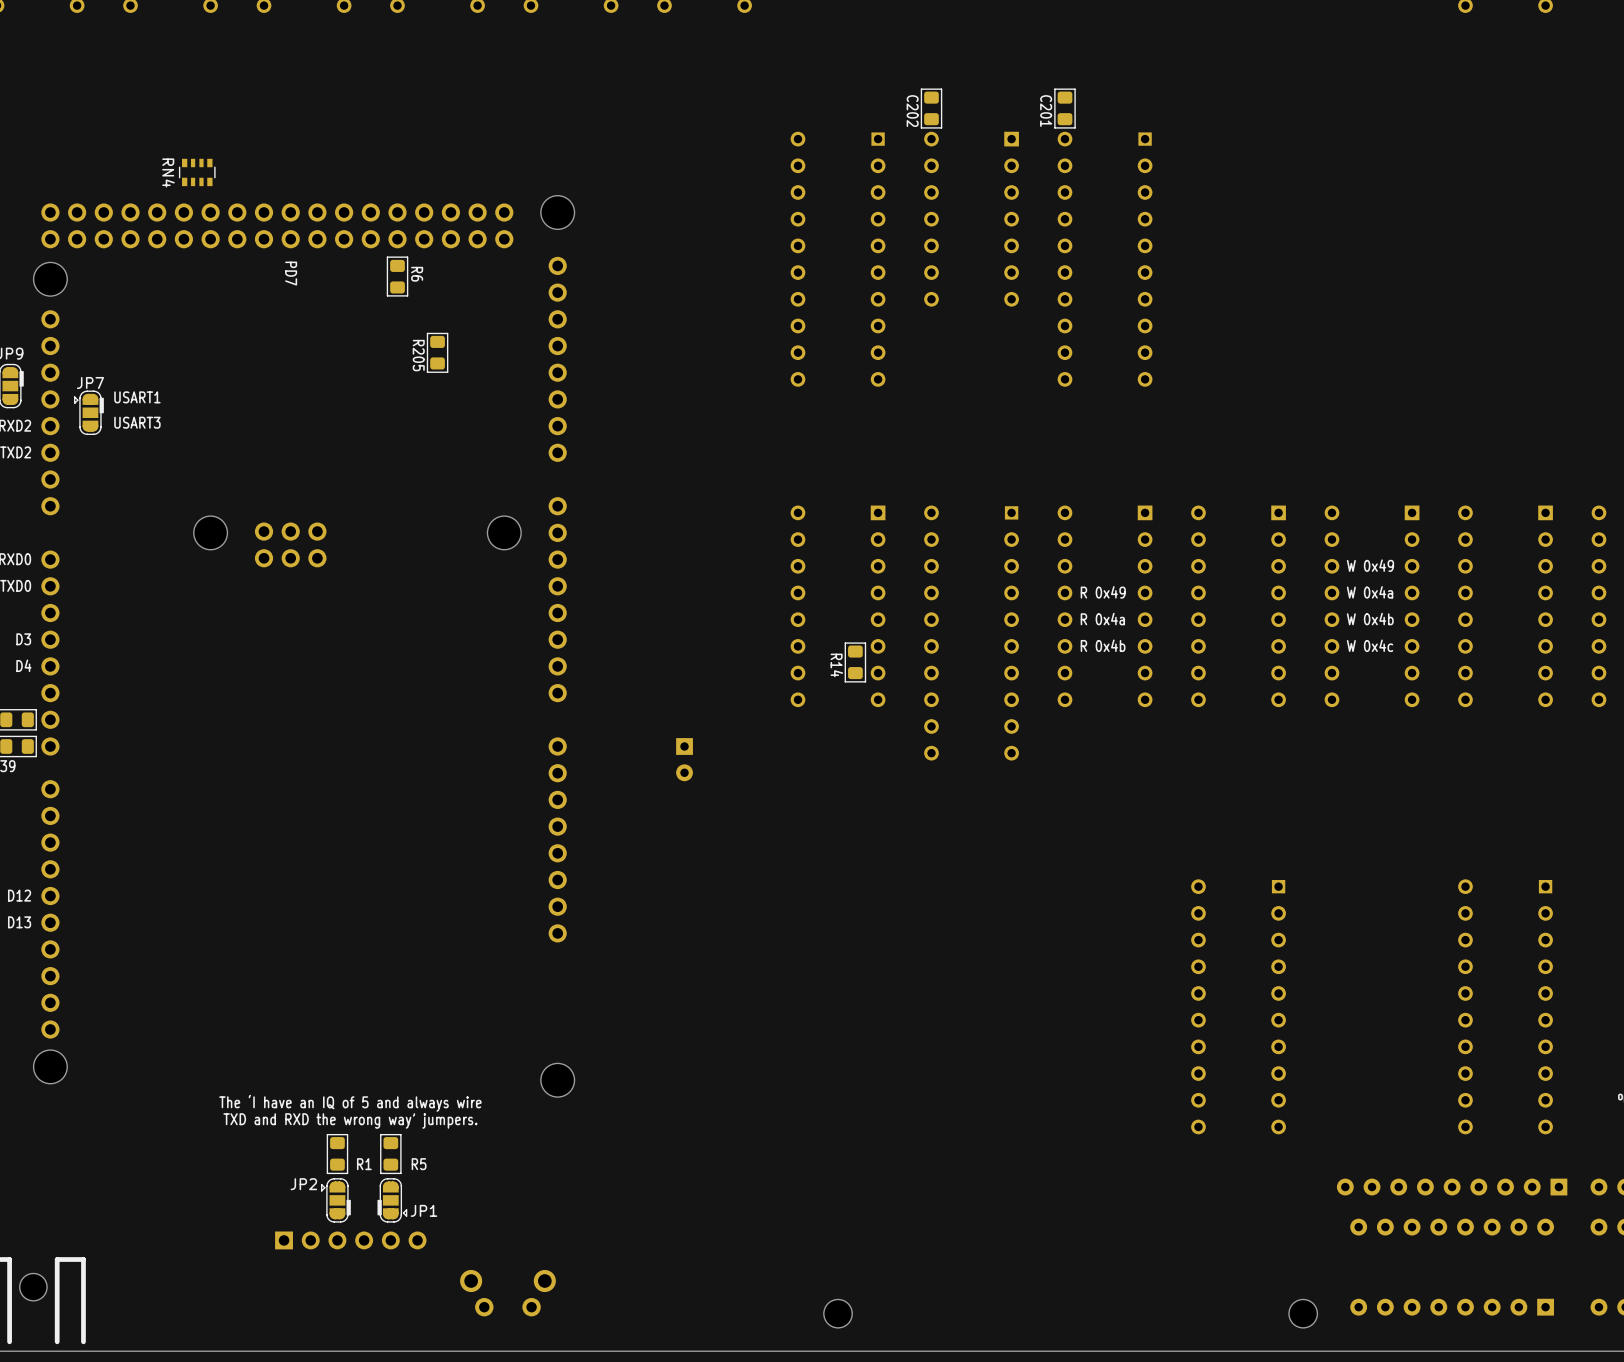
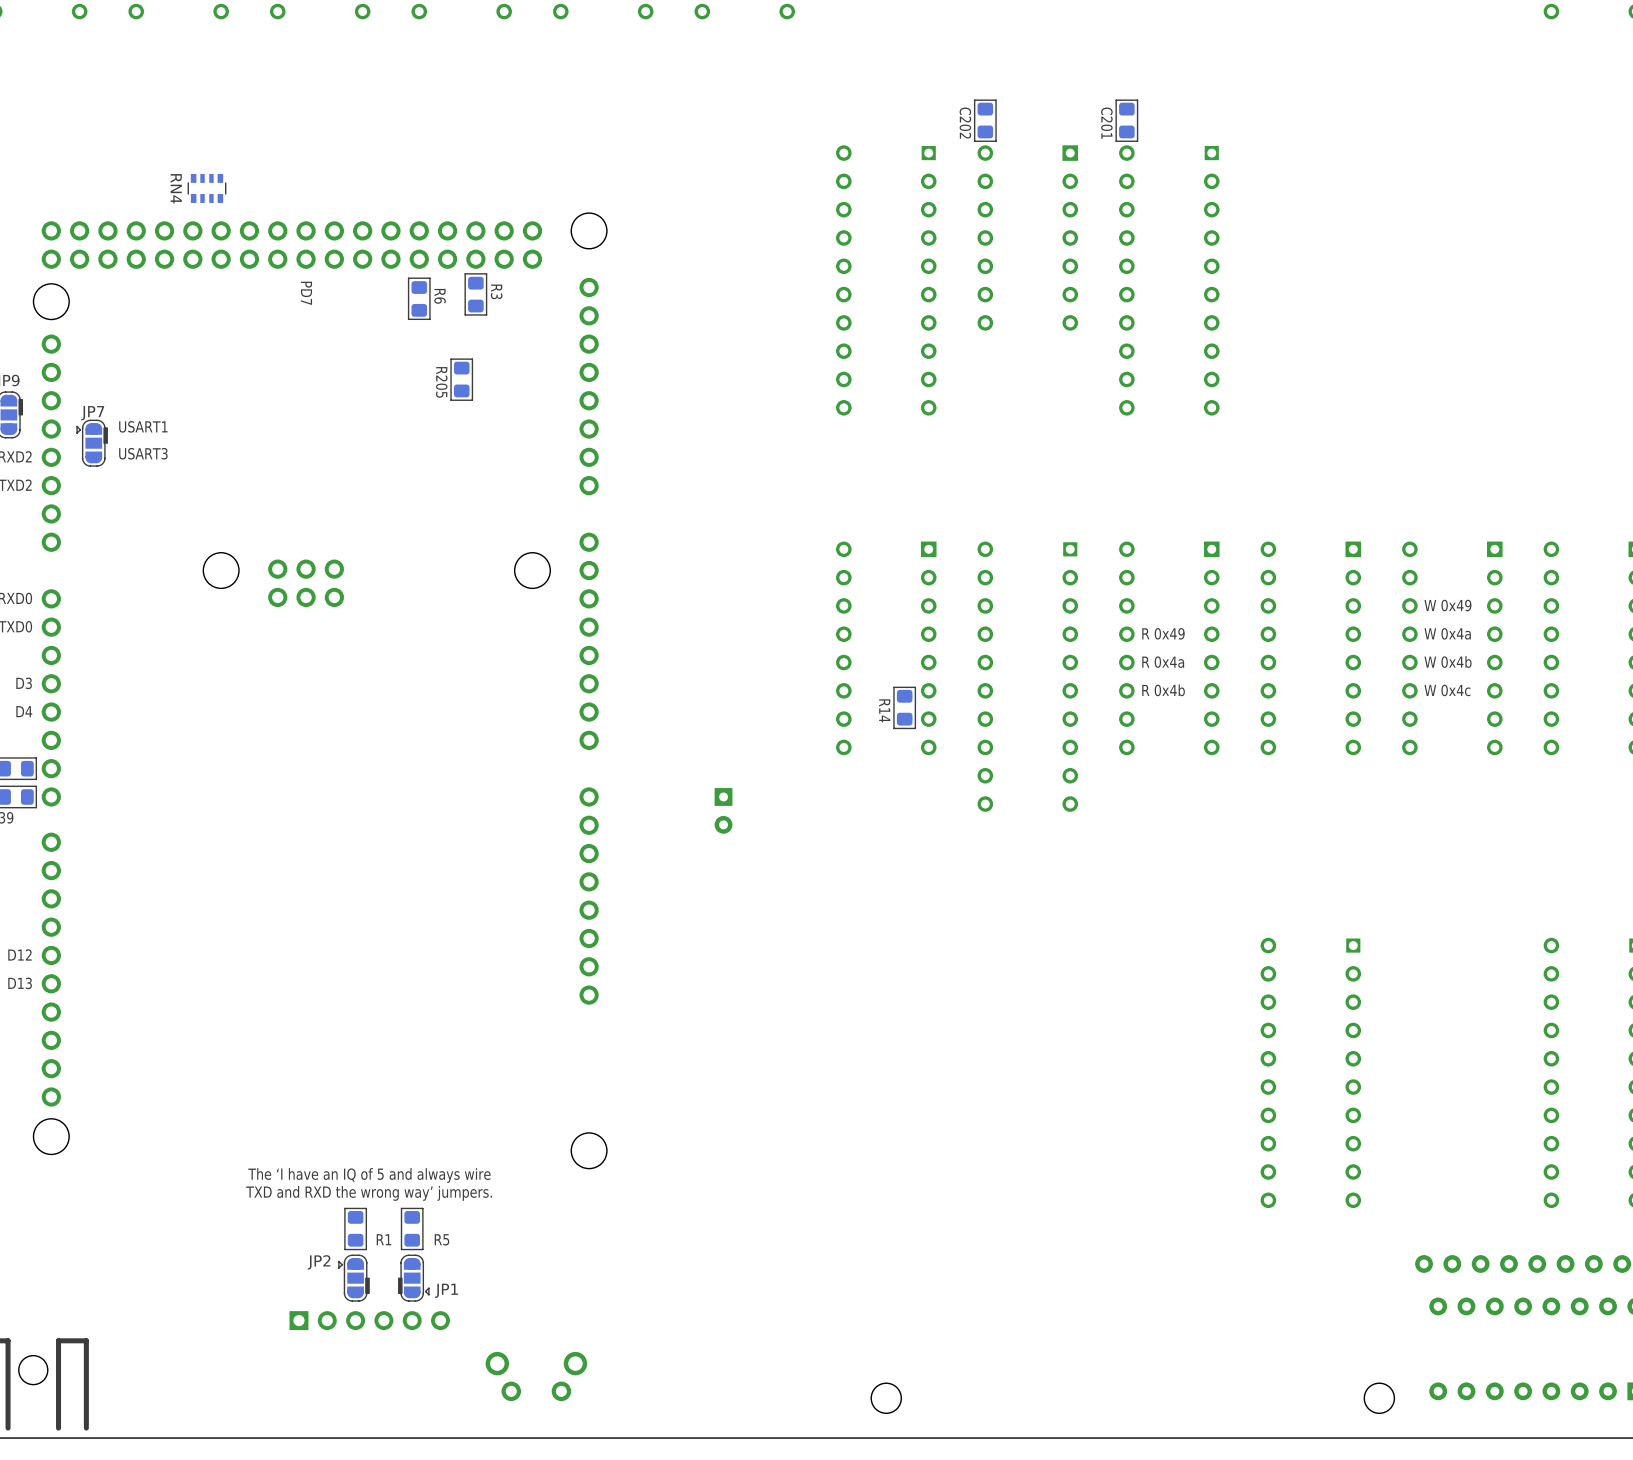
R3: none -> (475, 294)

